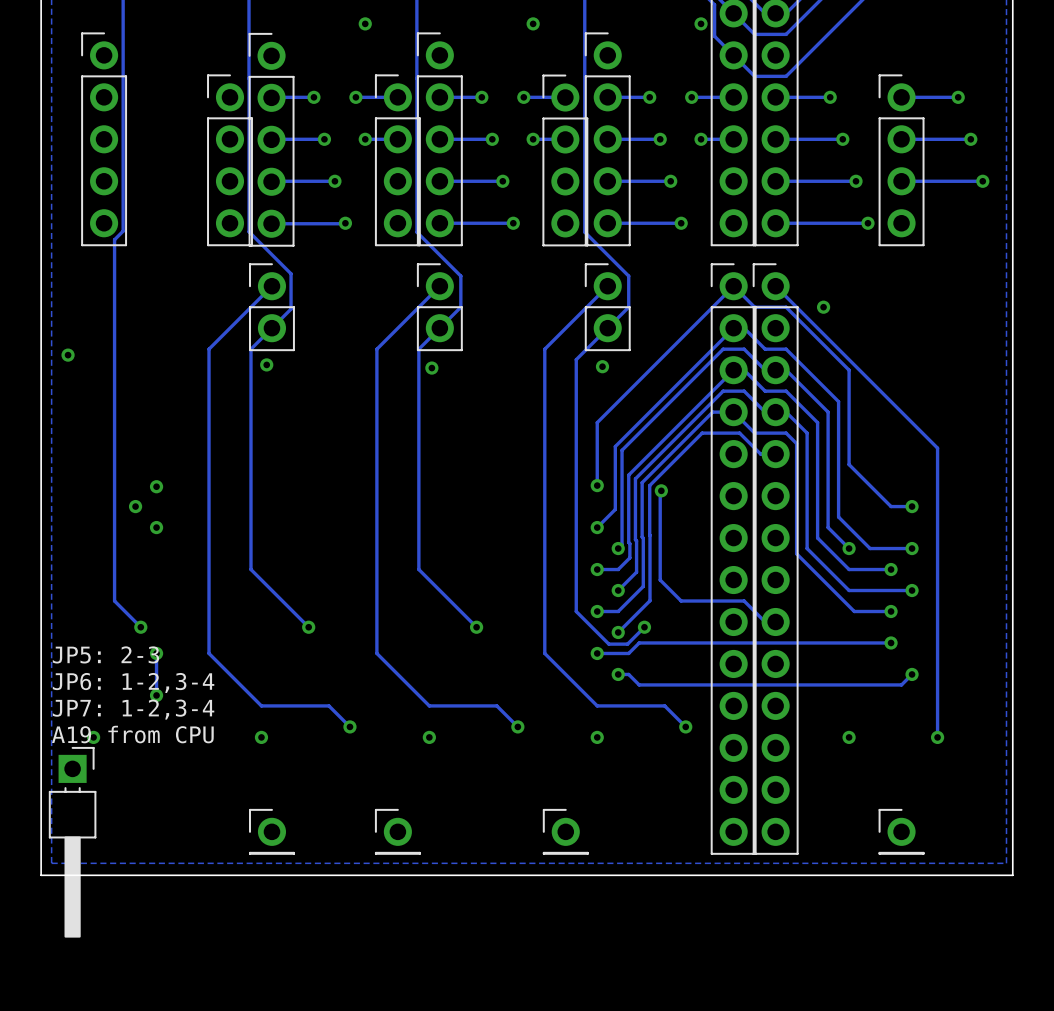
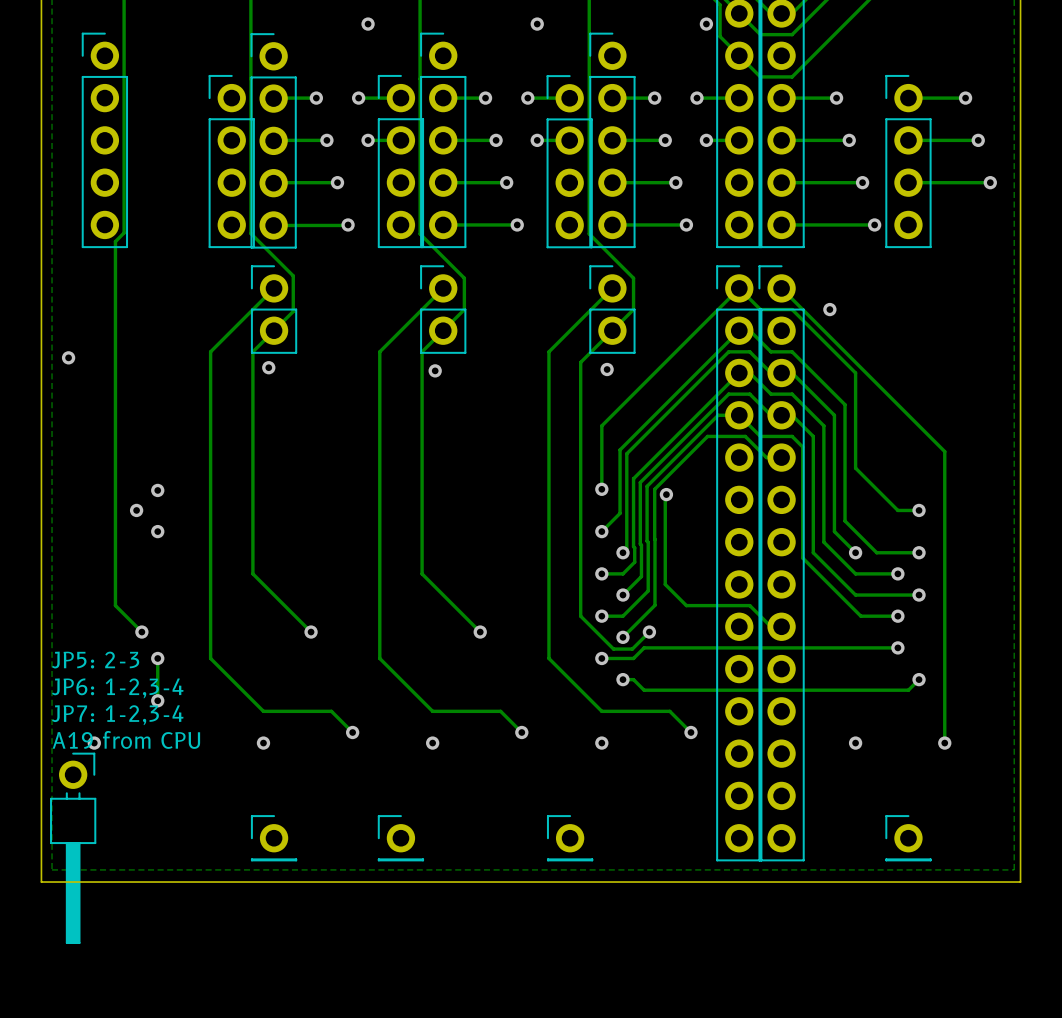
part footprint: [48, 746, 97, 938] -> [50, 752, 97, 944]

